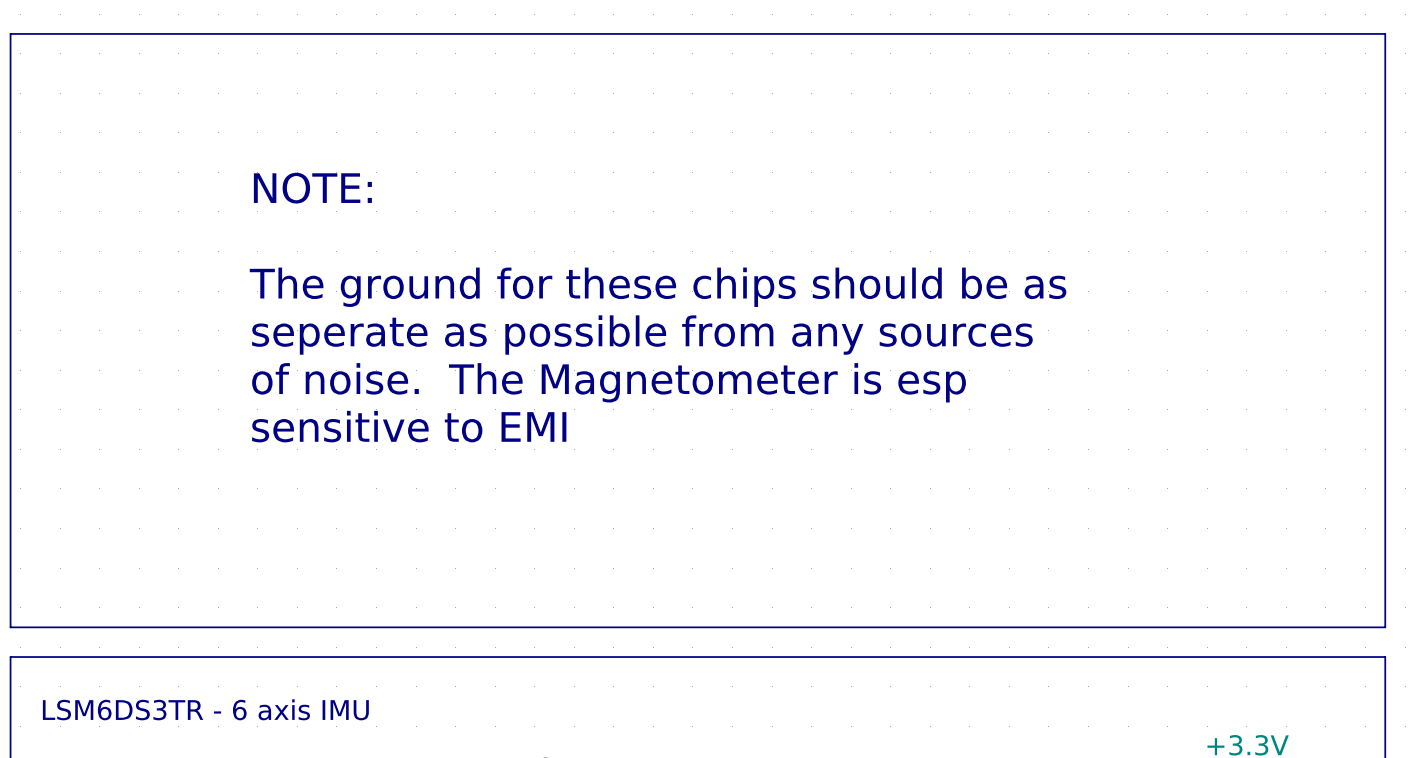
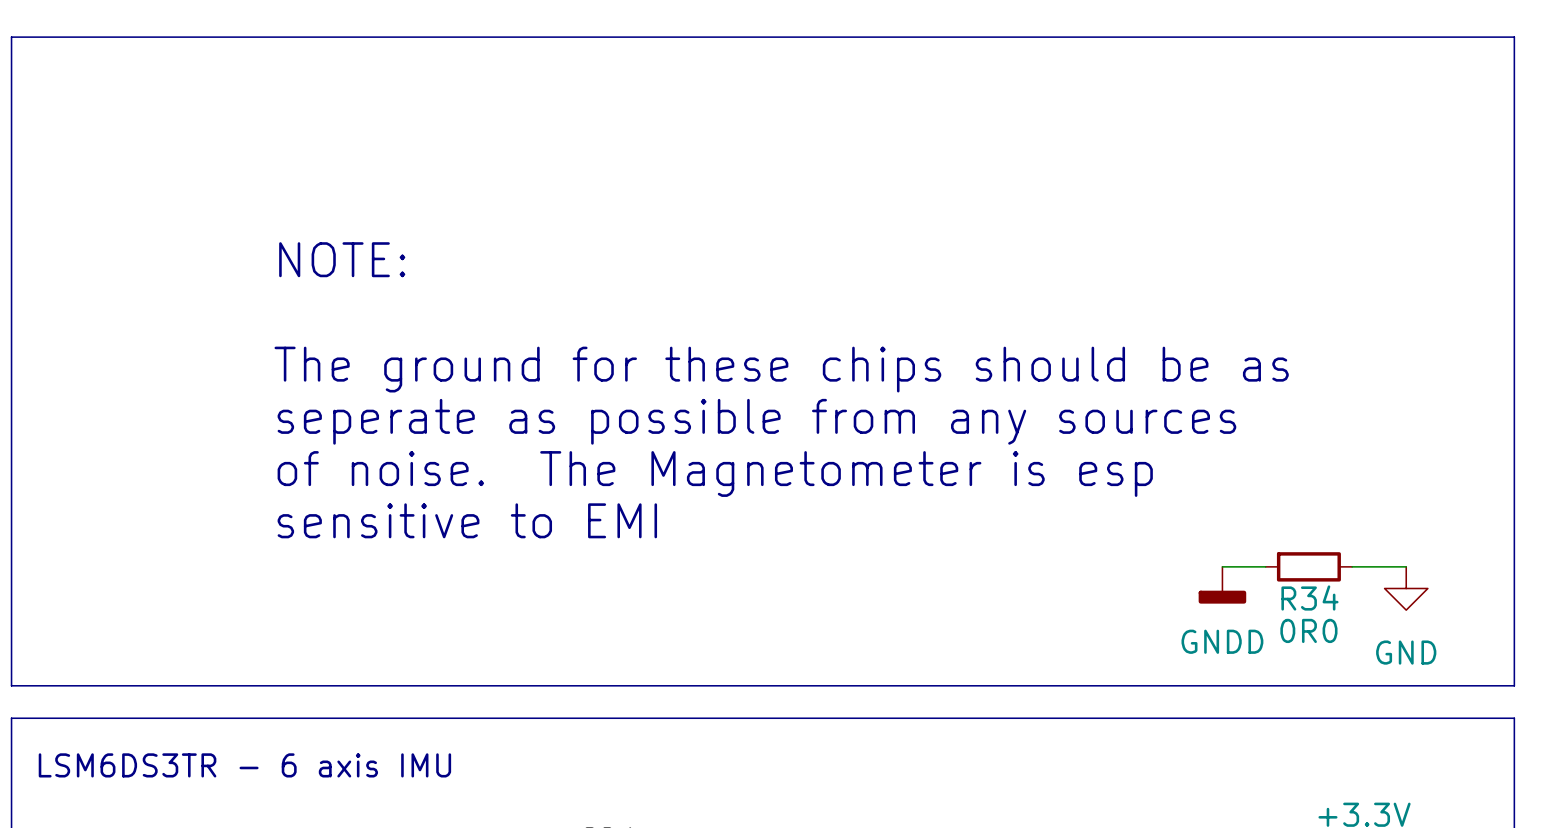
text position: NOTE: (312, 188) -> NOTE: (342, 259)
text position: The ground for these chips should be as (658, 287) -> The ground for these chips should be as (781, 369)
text position: seperate as possible from any sources (642, 335) -> seperate as possible from any sources (756, 421)
text position: of noise. The Magnetometer is esp (609, 382) -> of noise. The Magnetometer is esp (715, 474)
text position: sensitive to EMI (409, 426) -> sensitive to EMI (467, 520)
wire: none -> (1222, 566) (1265, 566)
R34: none -> 0R0 (1308, 566)
wire: none -> (1352, 566) (1406, 566)
power symbol: none -> GNDD (1222, 585)
power symbol: none -> GND (1406, 588)
text position: LSM6DS3TR - 6 axis IMU (205, 709) -> LSM6DS3TR - 6 axis IMU (244, 765)

